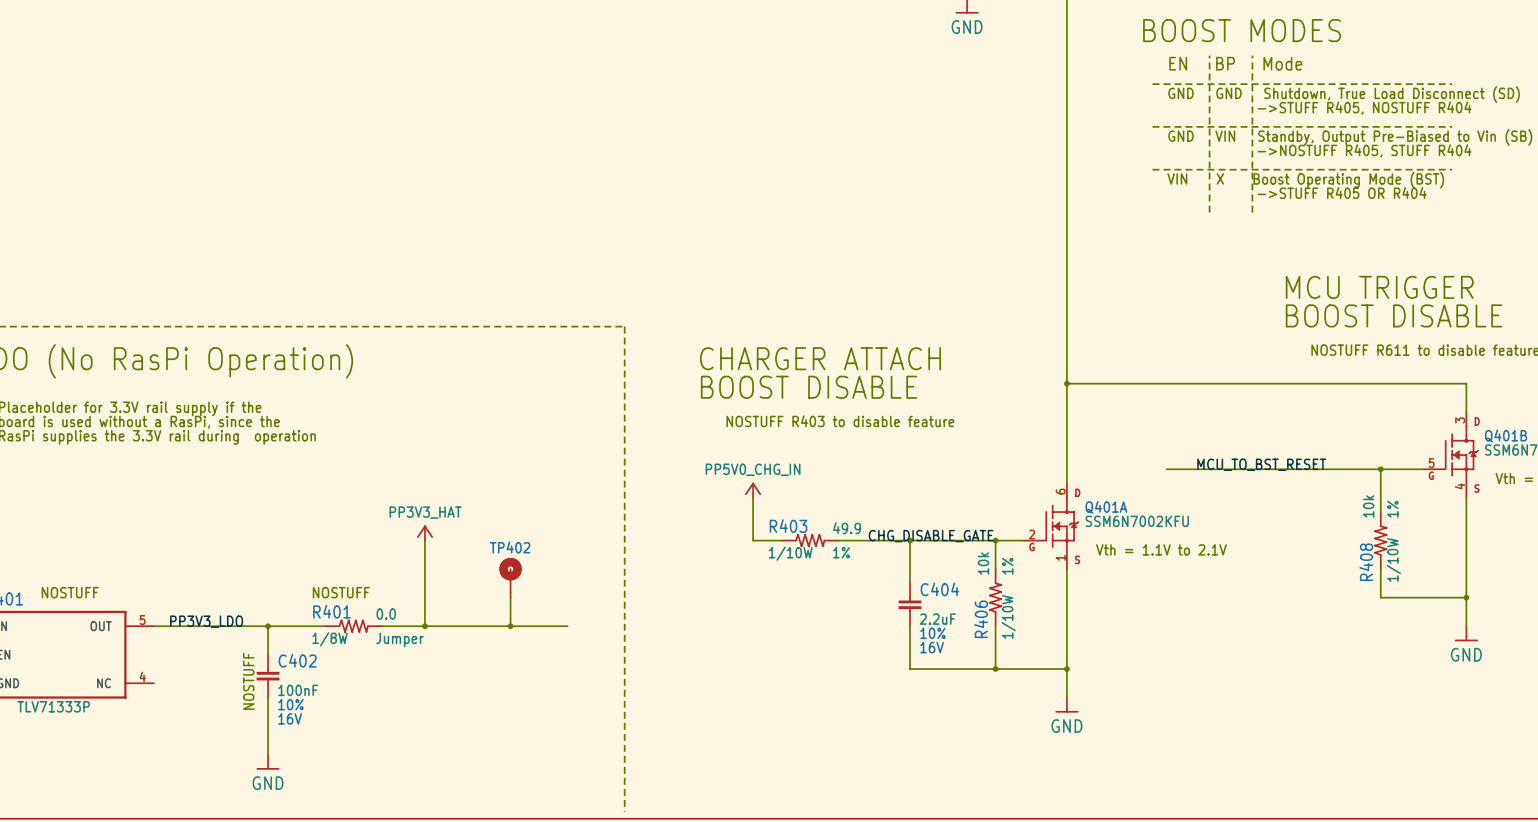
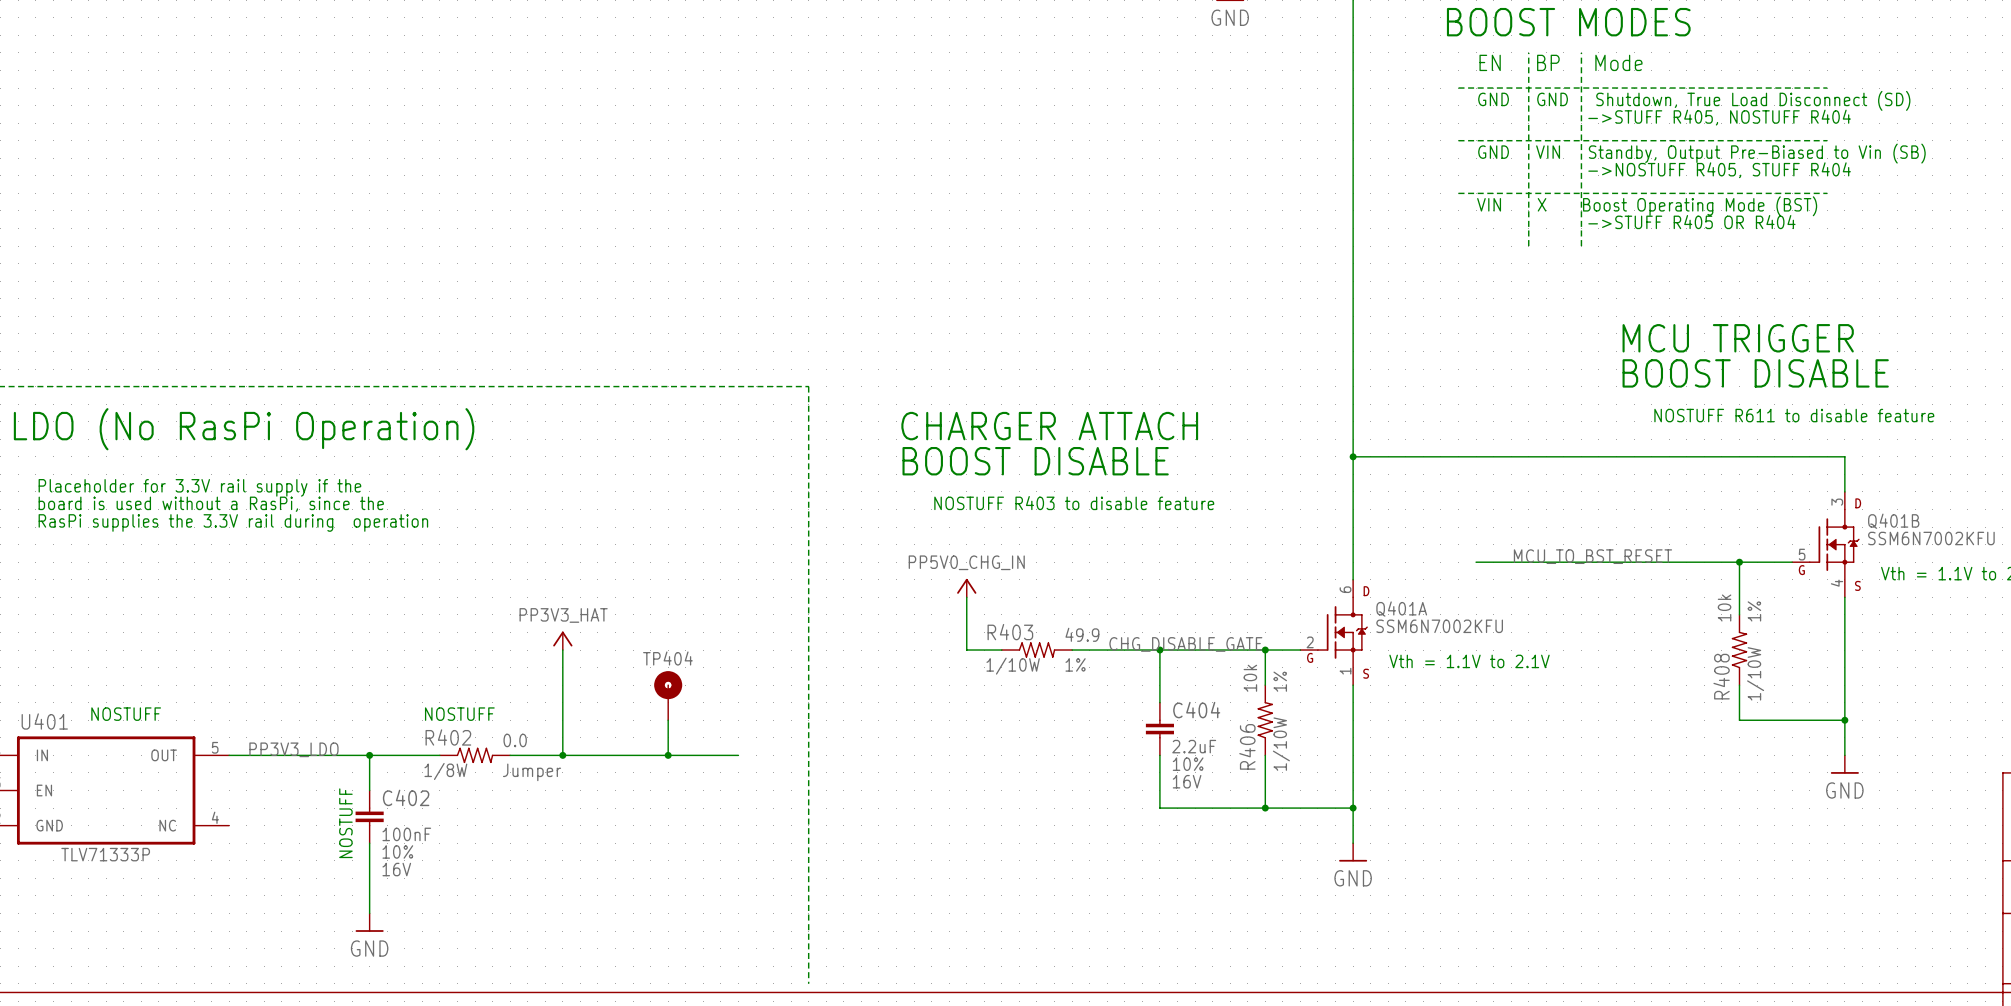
TP402 name: TP402 (510, 547) -> TP404 (667, 658)
R401 name: R401 (332, 611) -> R402 (448, 737)

